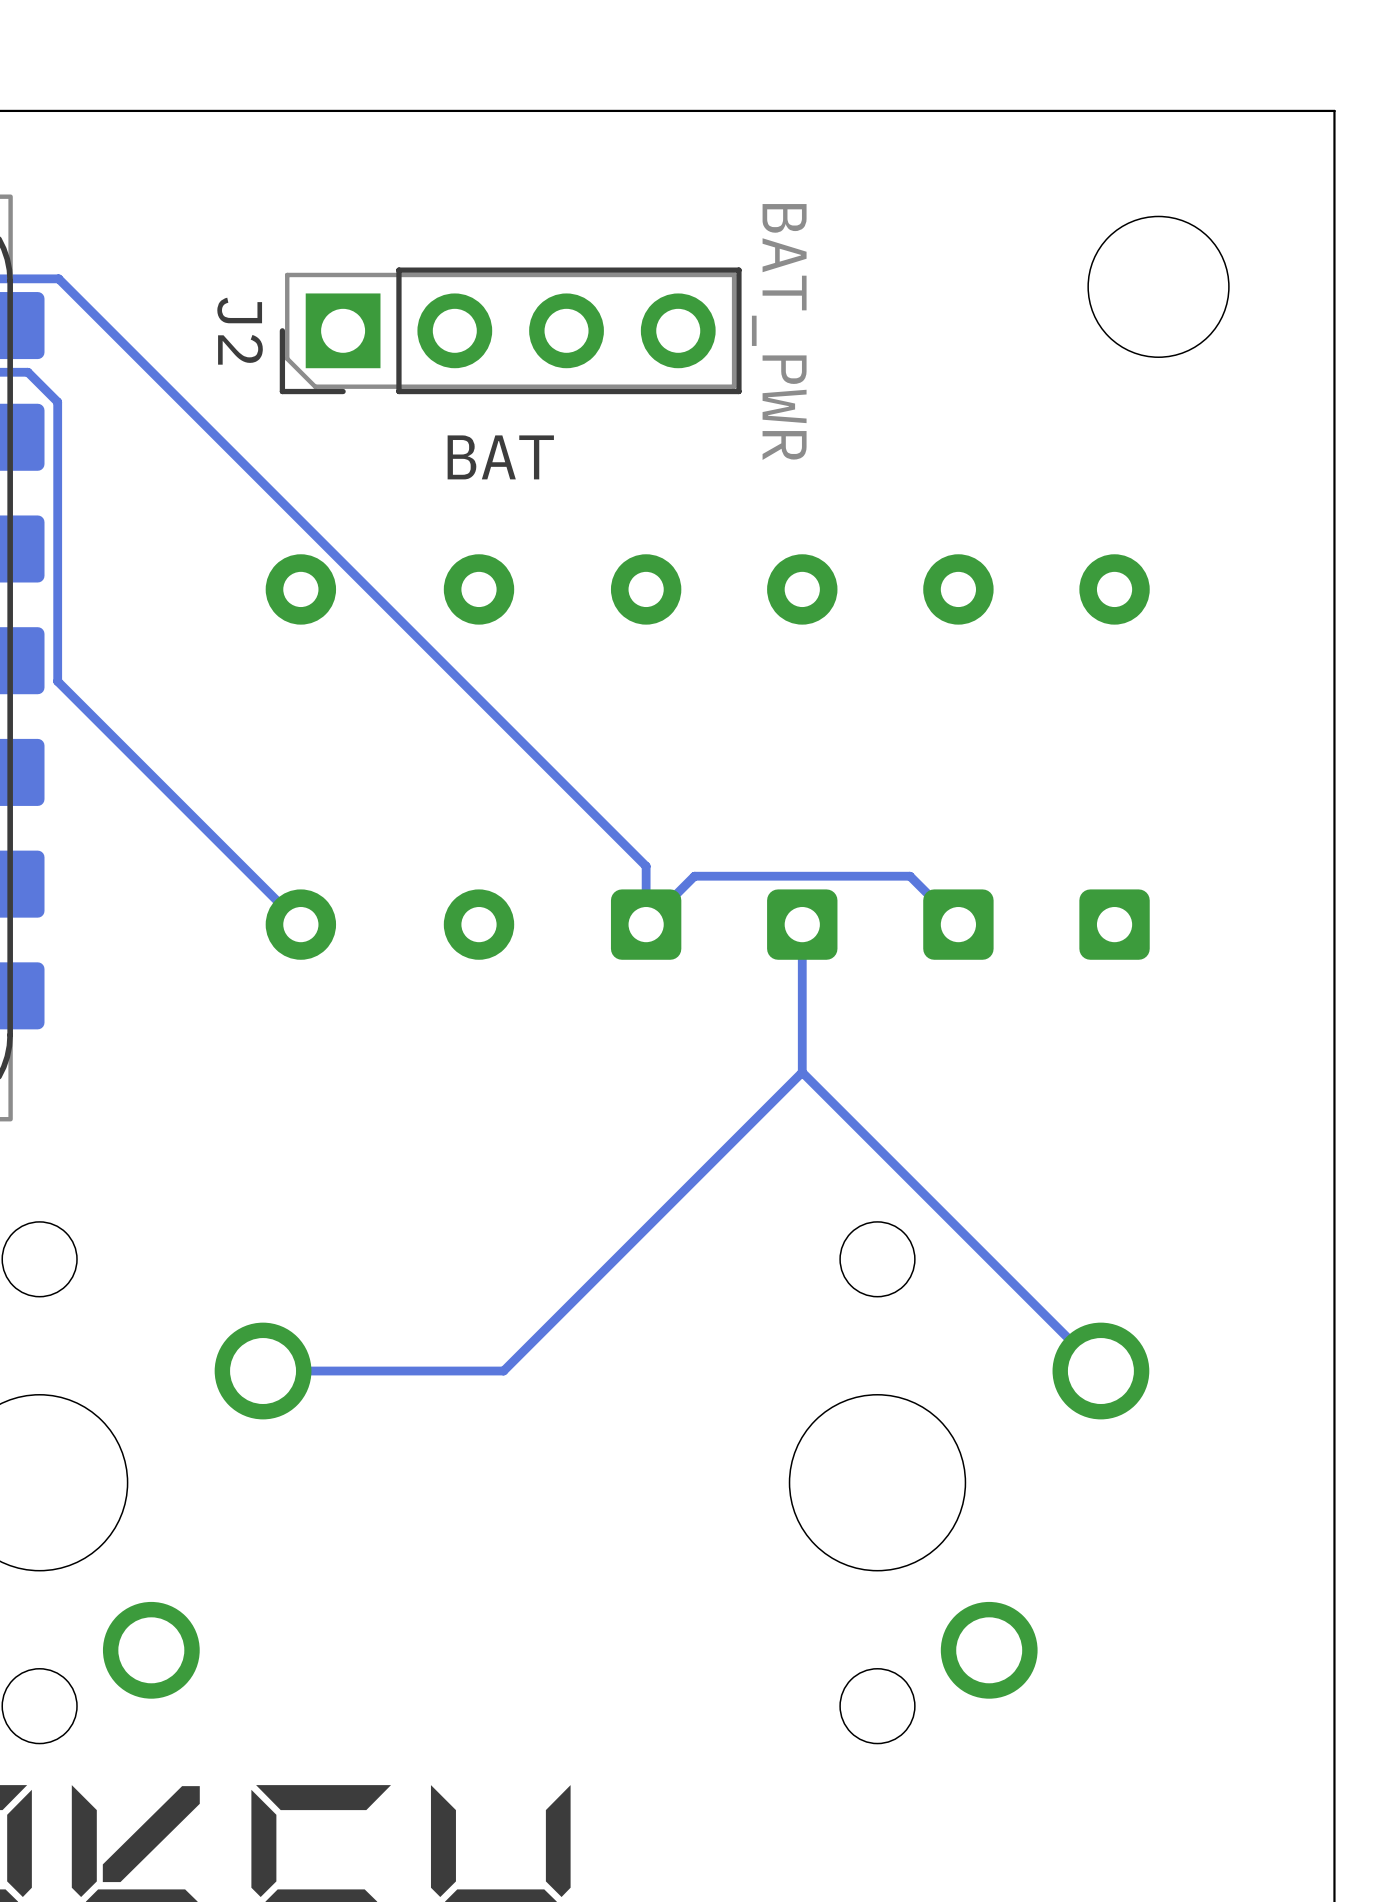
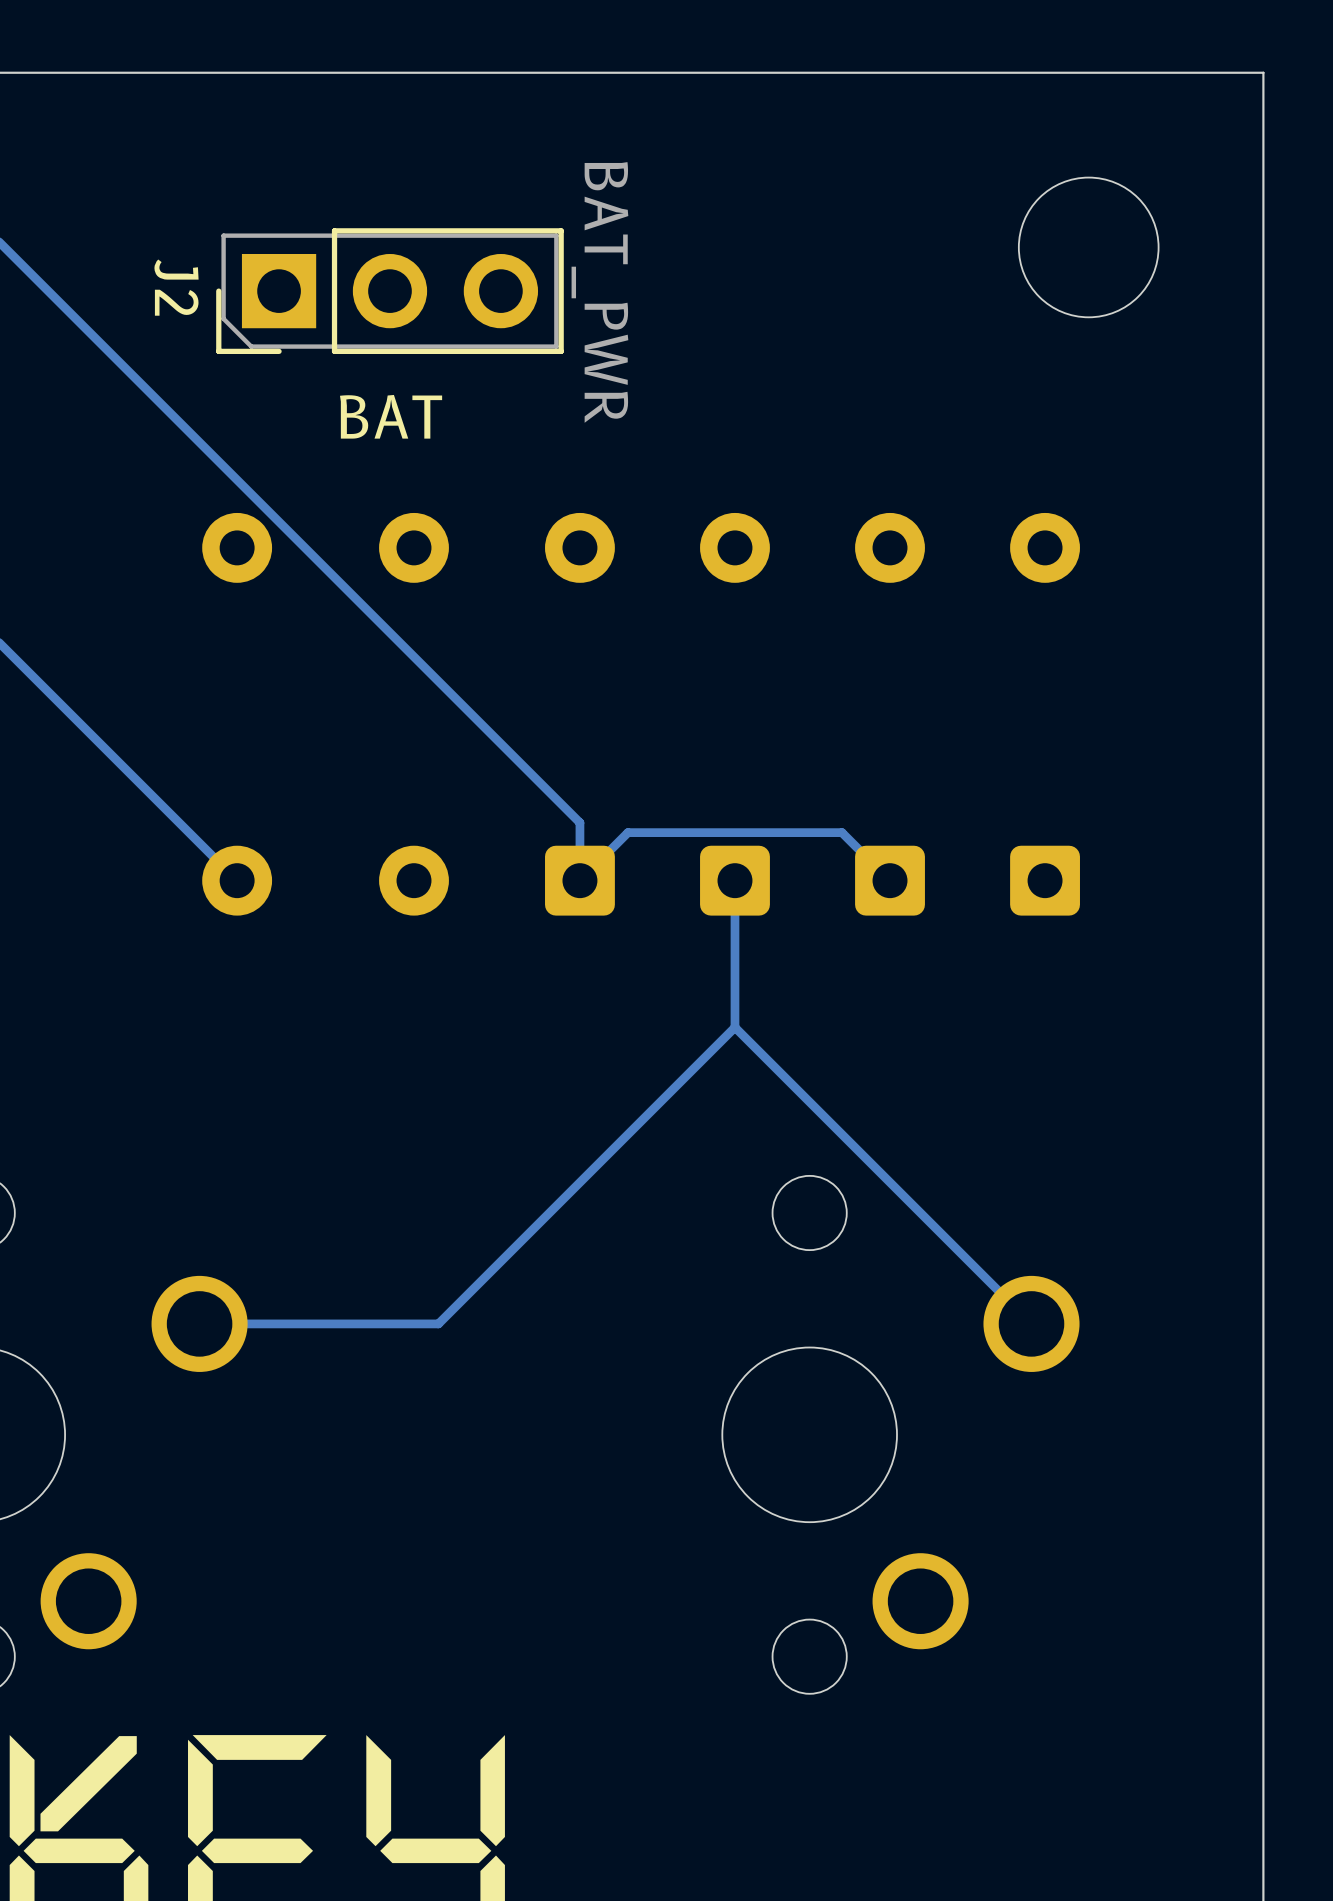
J2 footprint: [279, 267, 742, 395] -> [216, 228, 564, 354]
text position: BAT (500, 457) -> BAT (391, 416)

